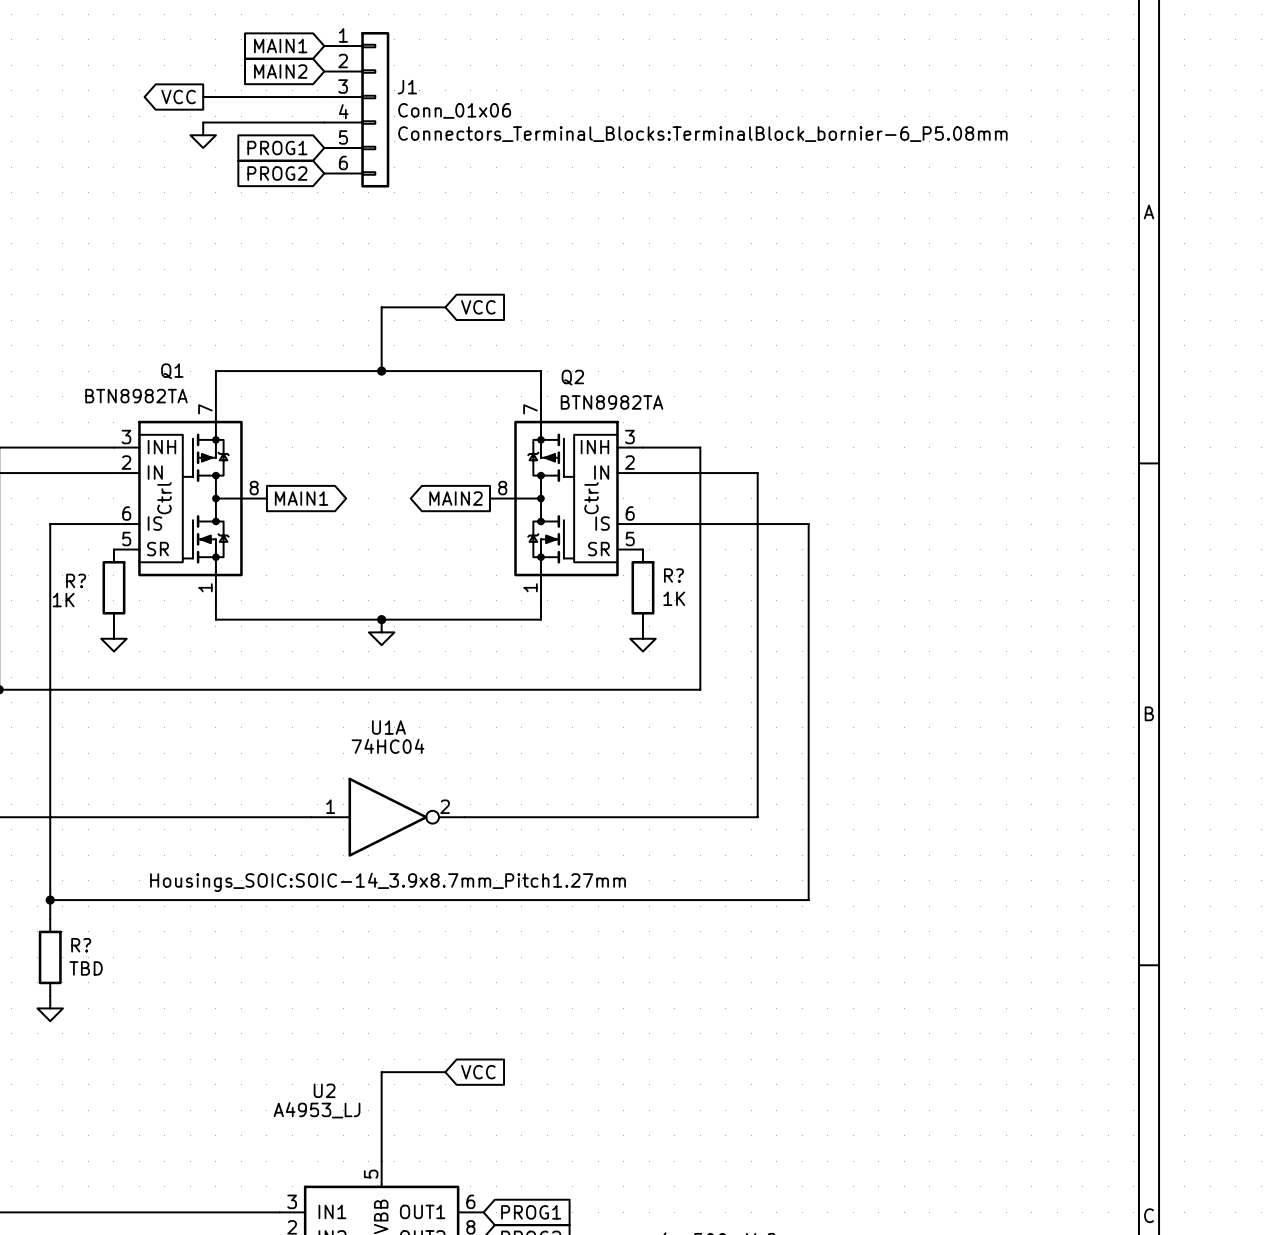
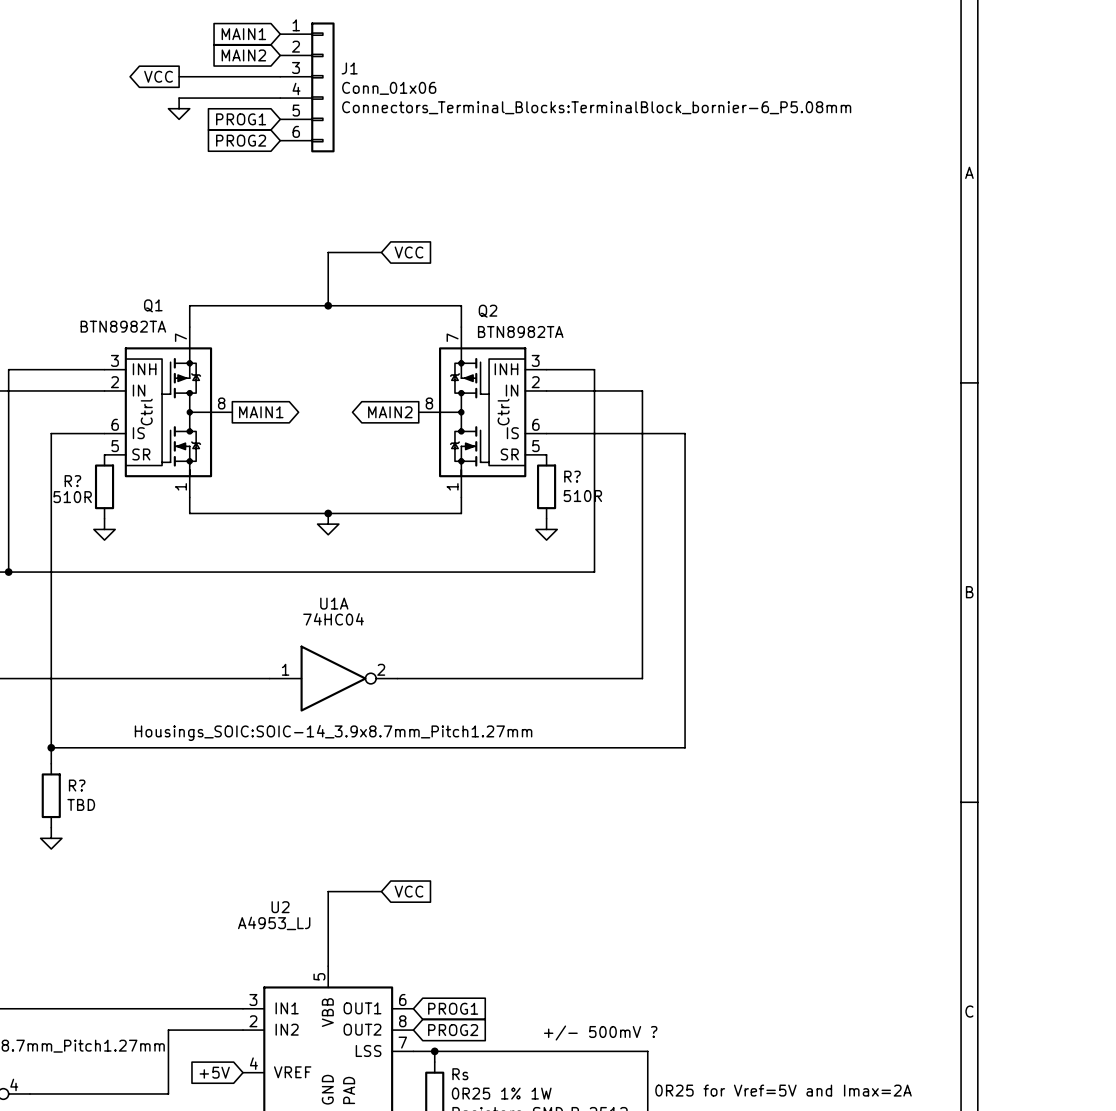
R? value: 1K (674, 598) -> 510R (582, 496)
R? value: 1K (63, 600) -> 510R (72, 497)

